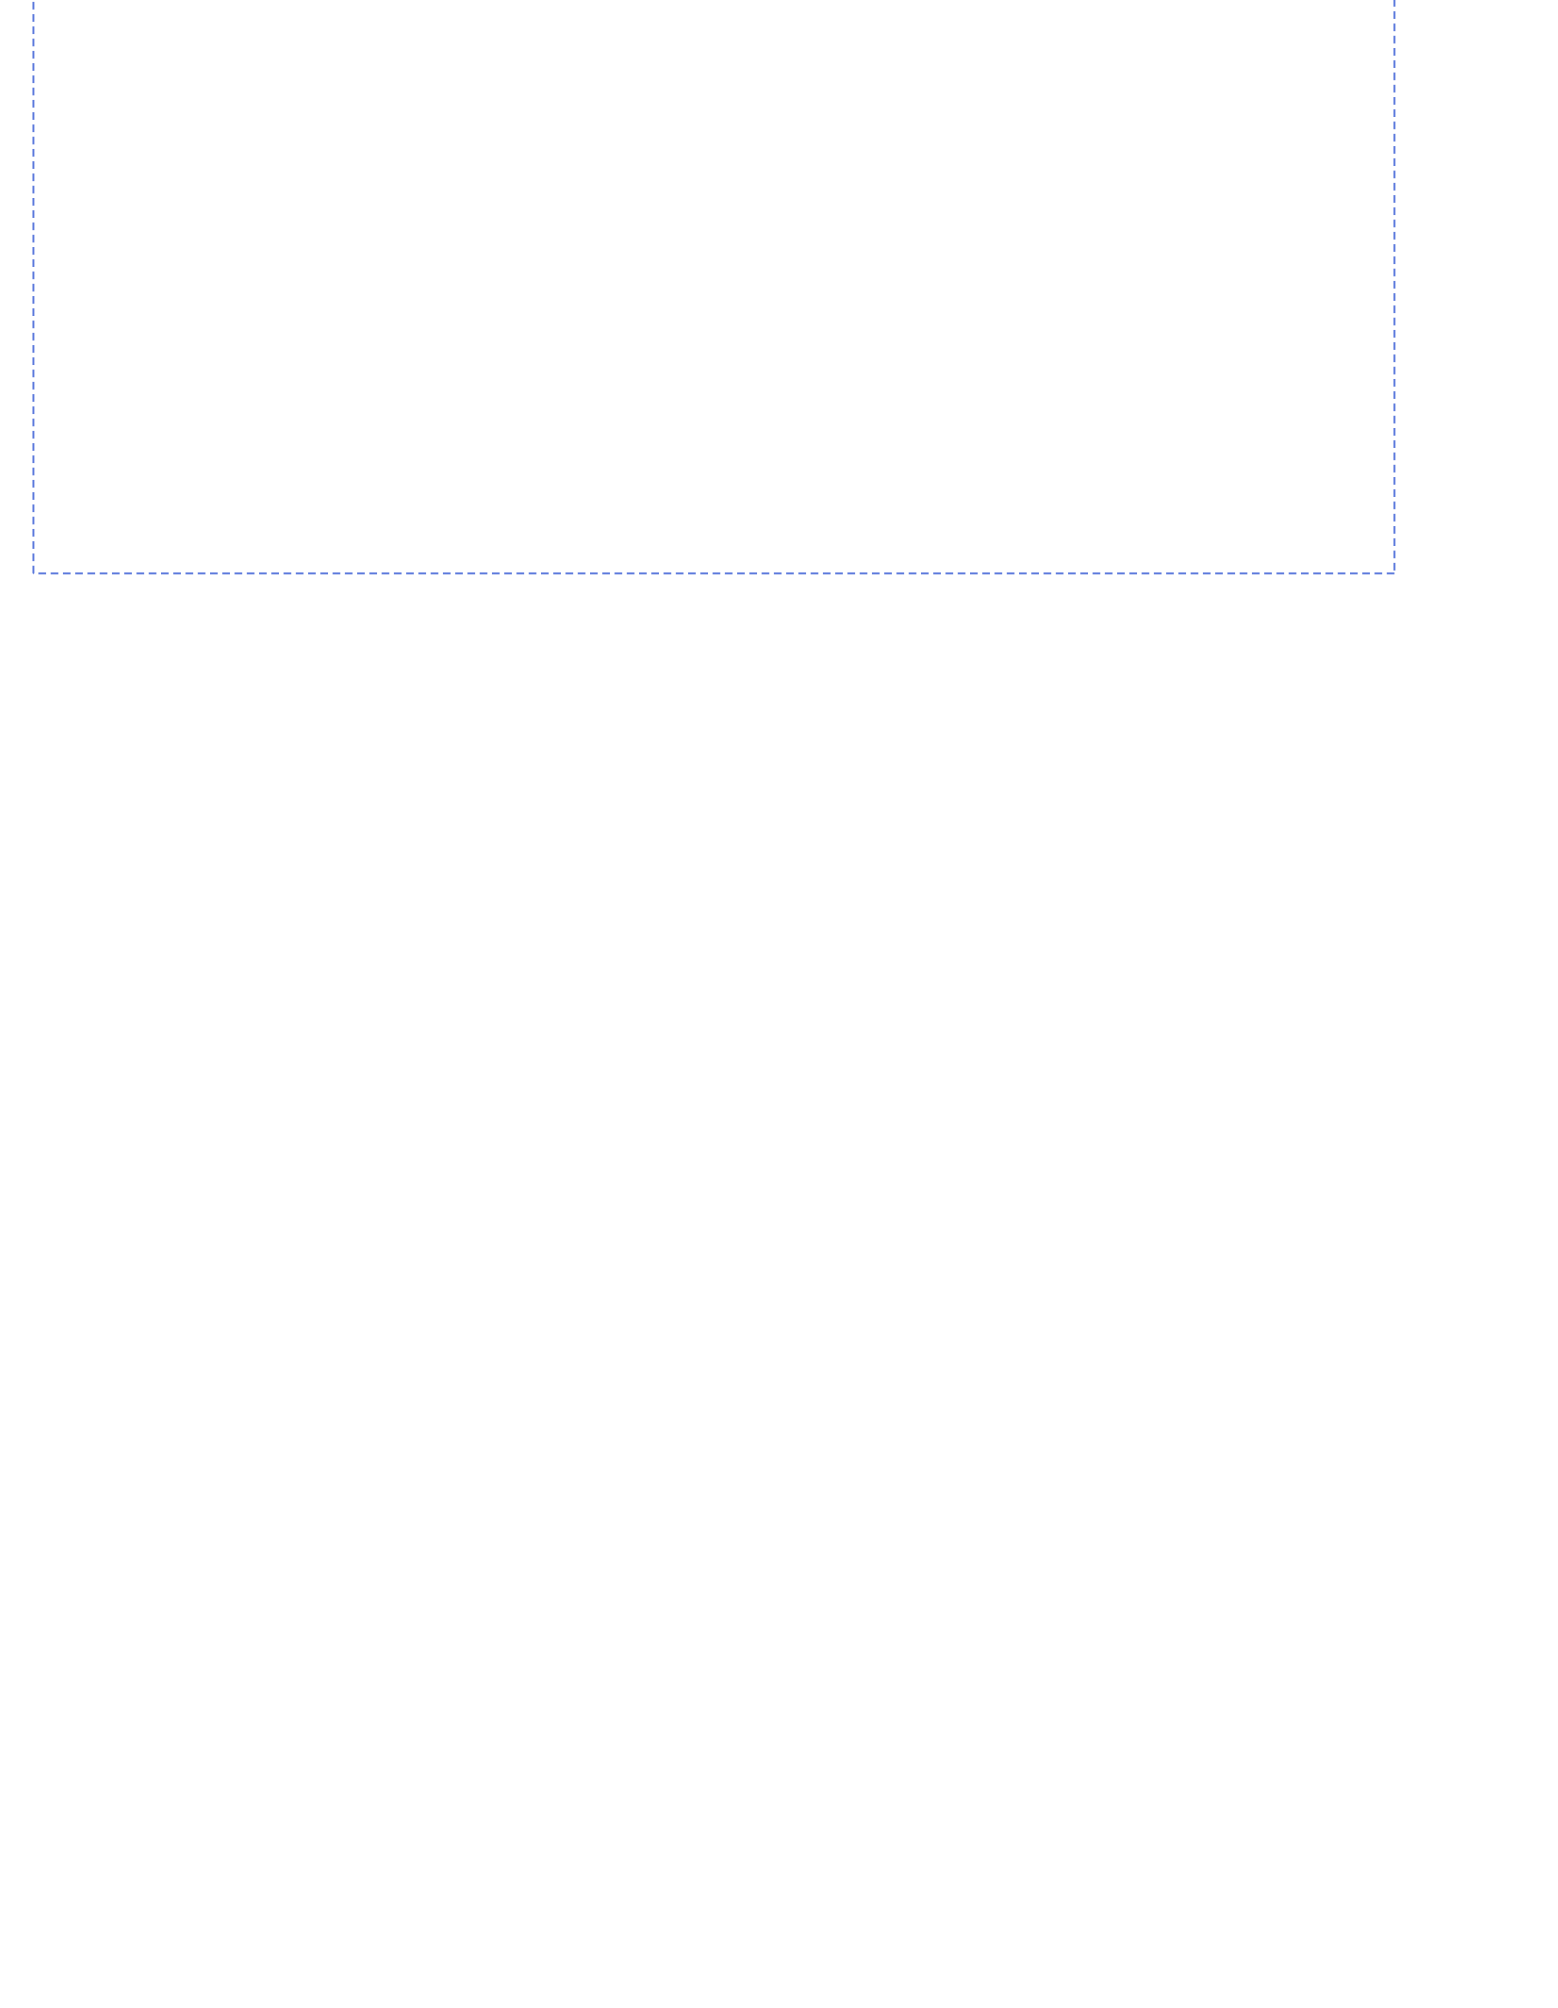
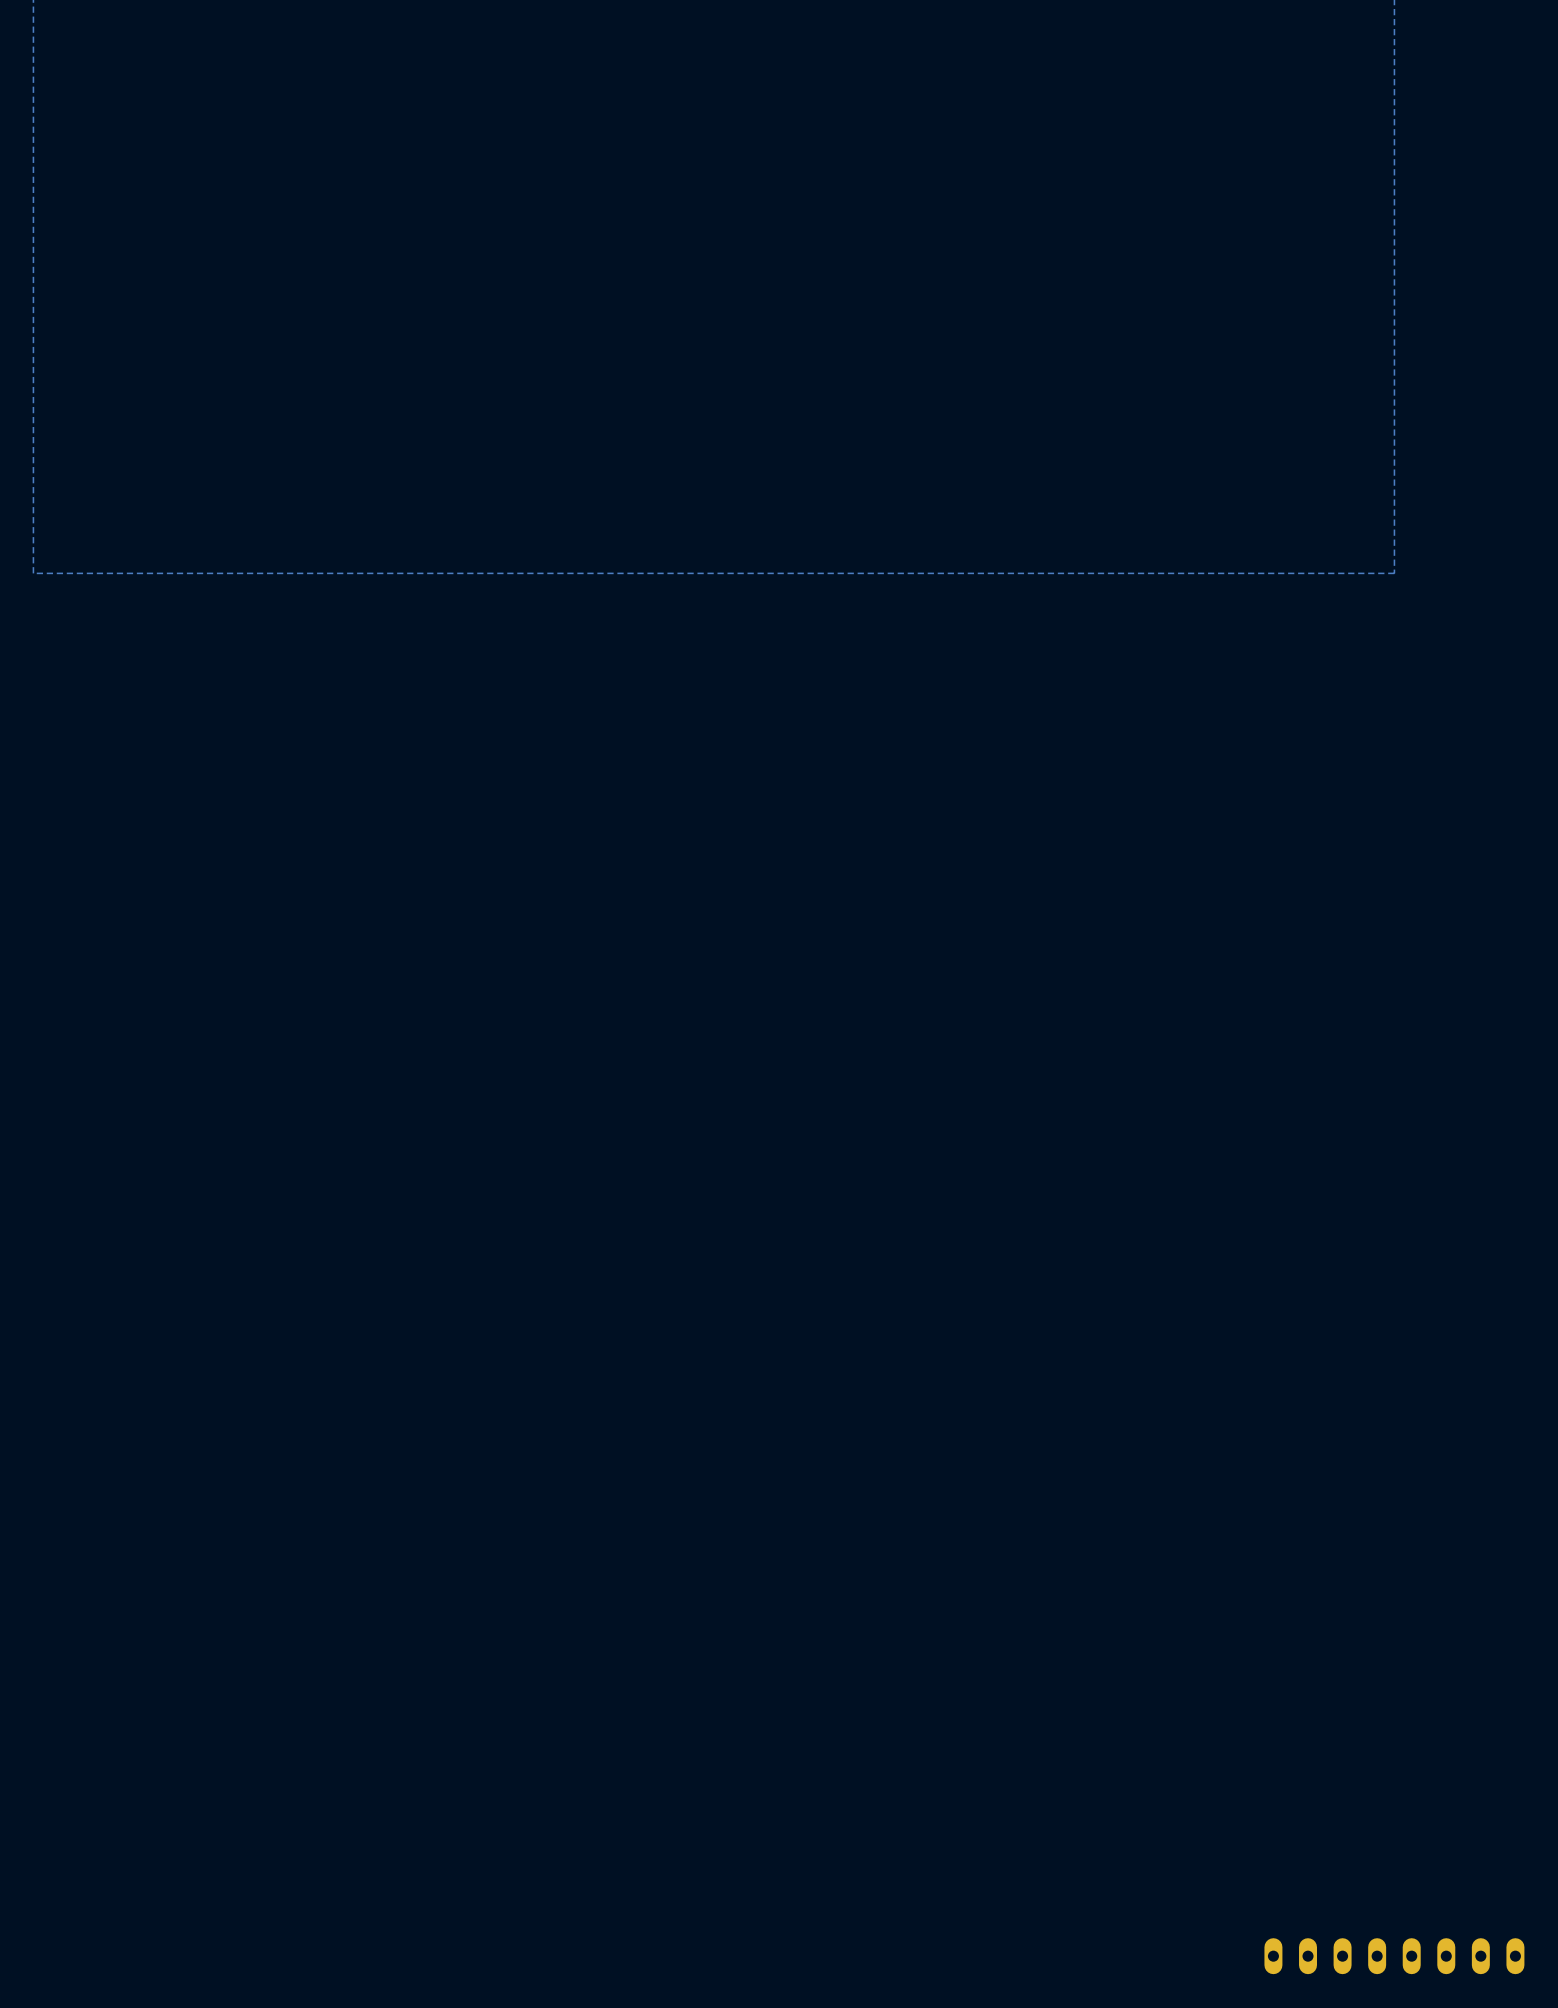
part: none -> (1394, 1956)

